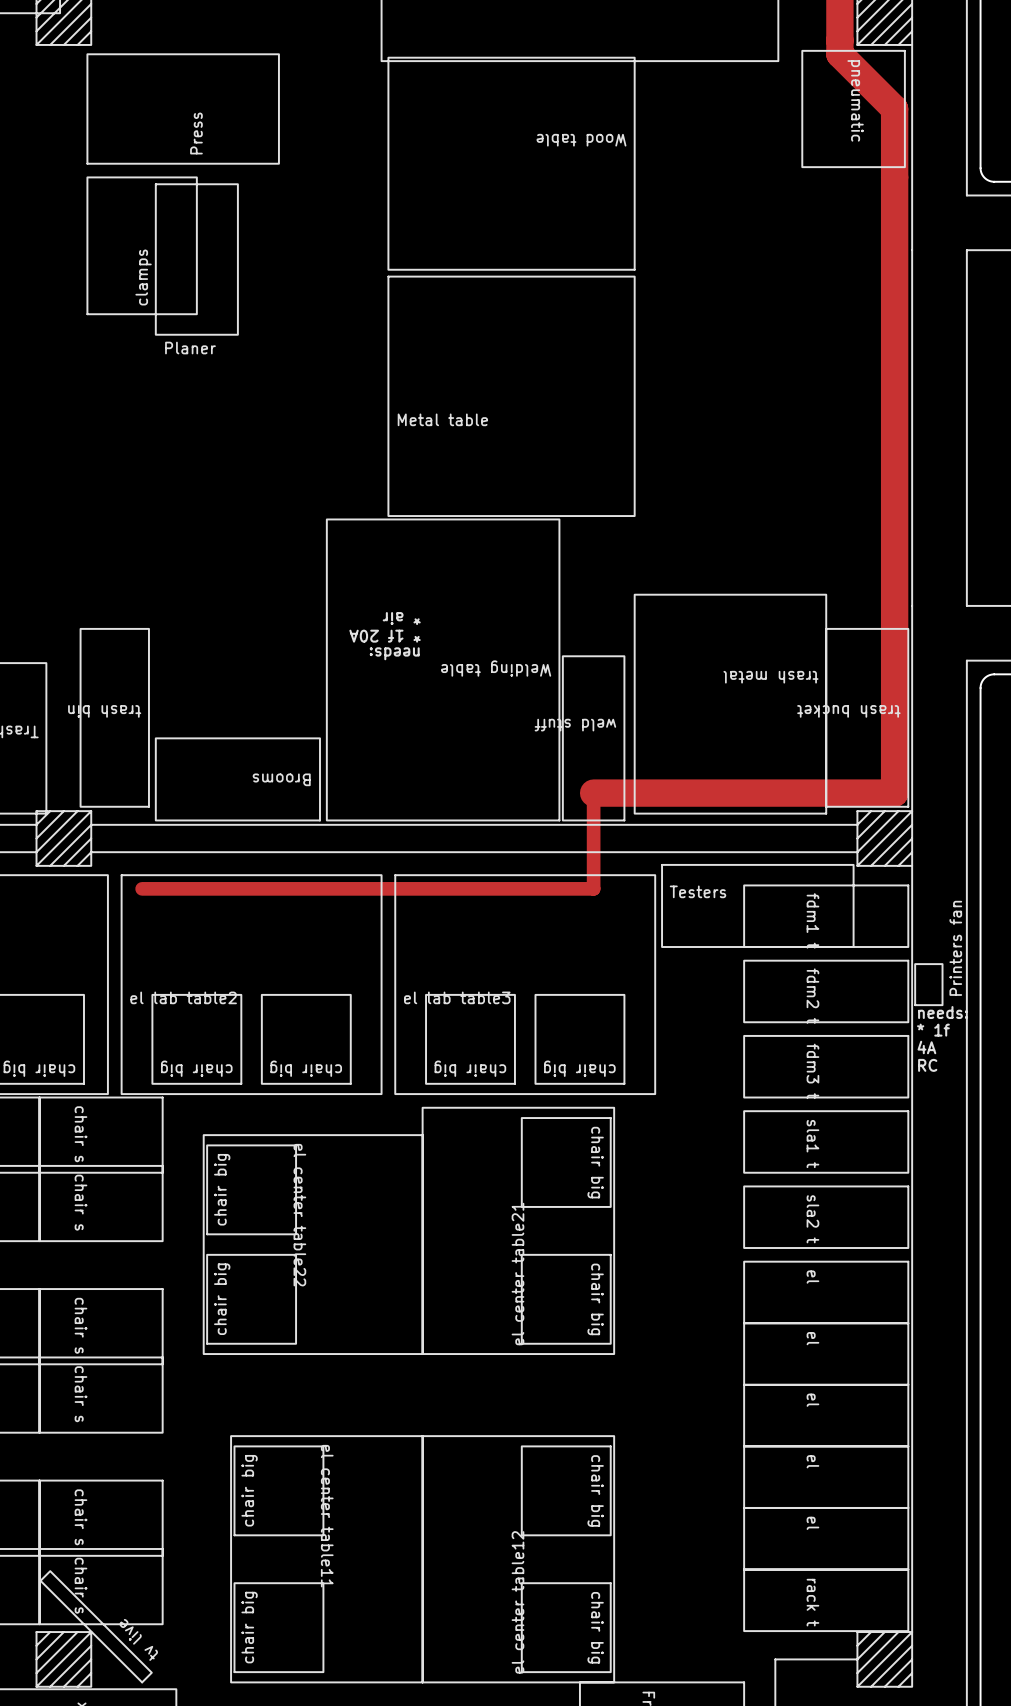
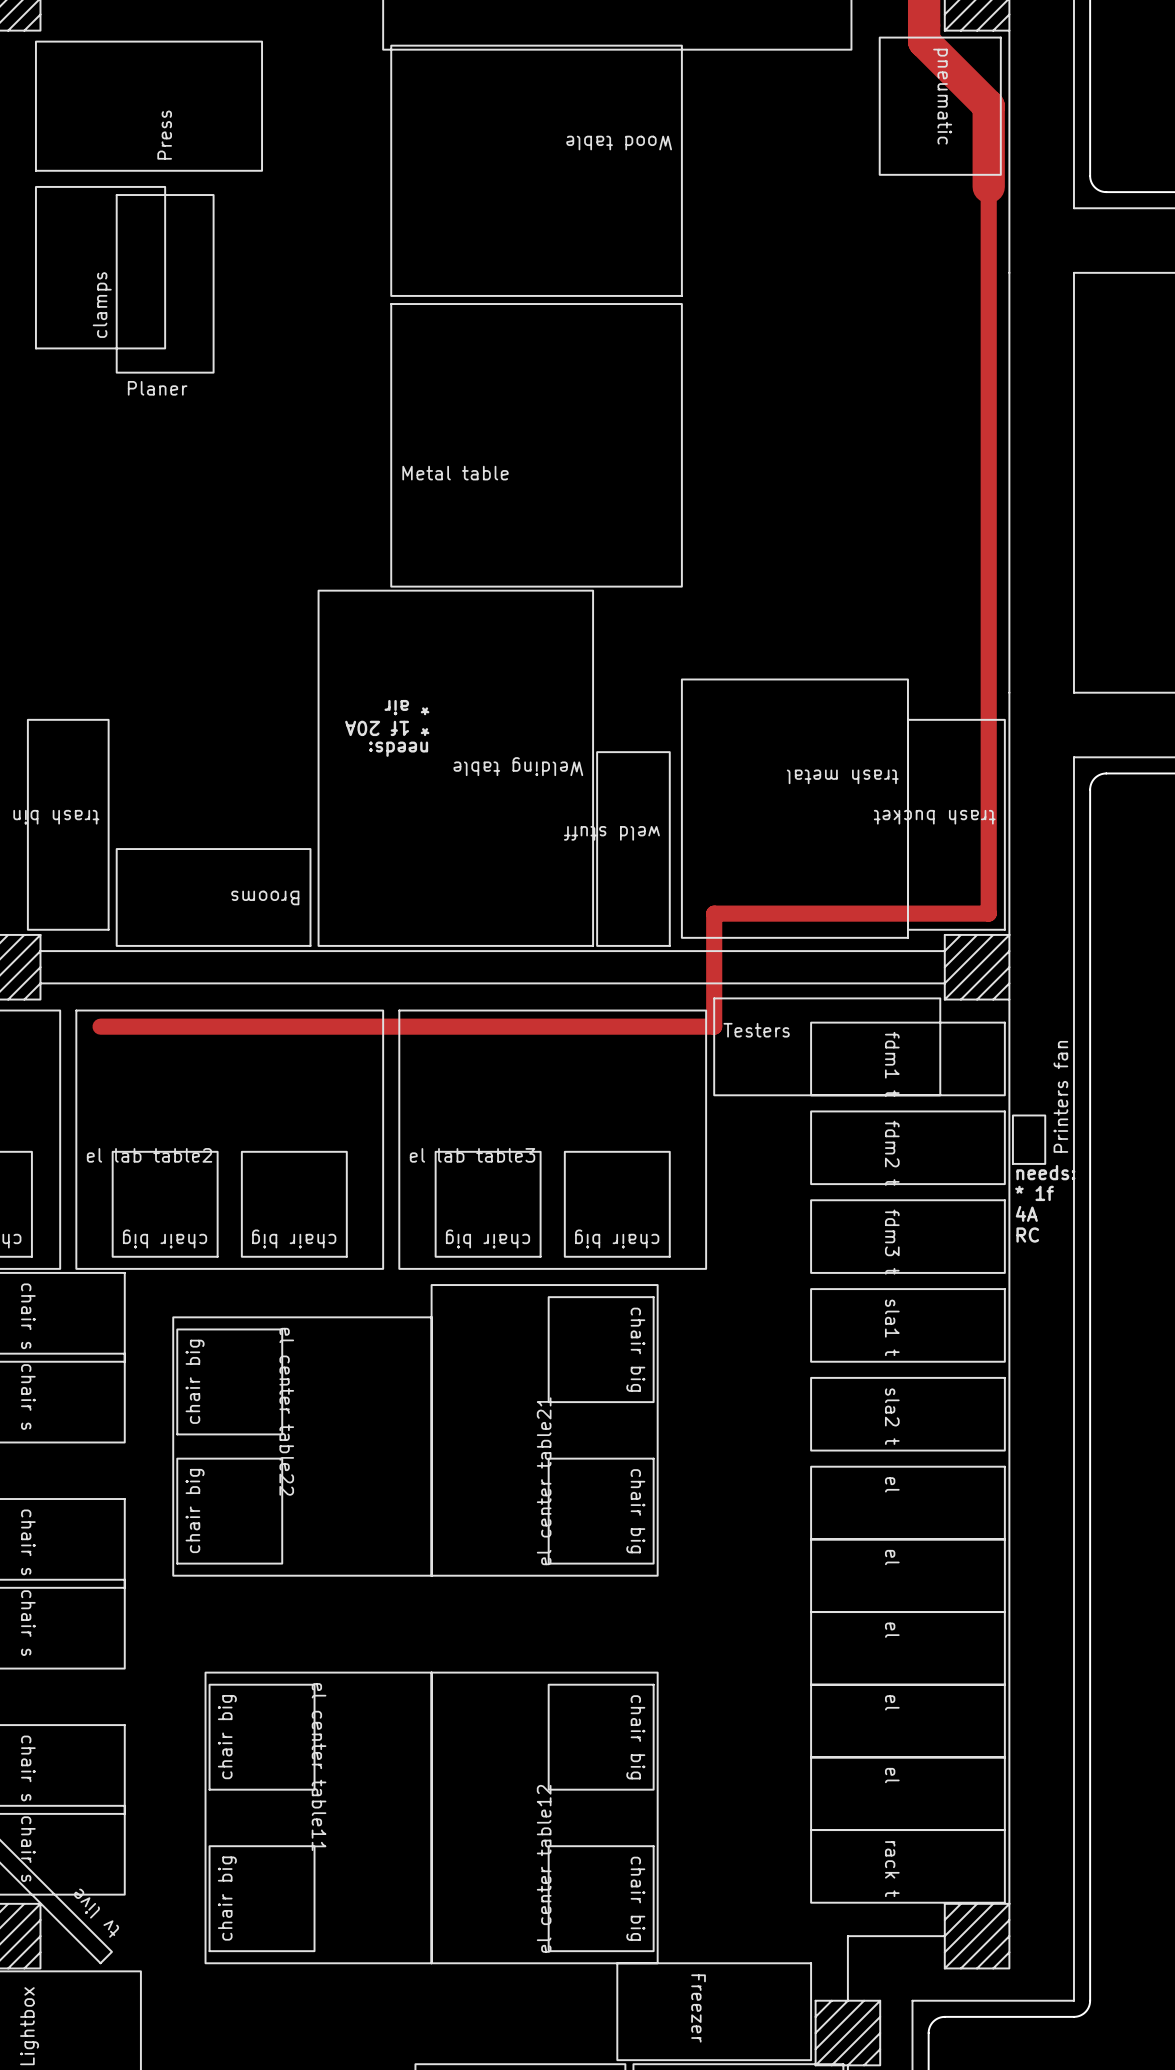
track width: thick (894, 177) (894, 793) (662, 793) -> thin (988, 186) (988, 913) (714, 913)
track: (662, 793) (593, 793) (593, 888) -> (714, 913) (714, 1026) (633, 1026)

